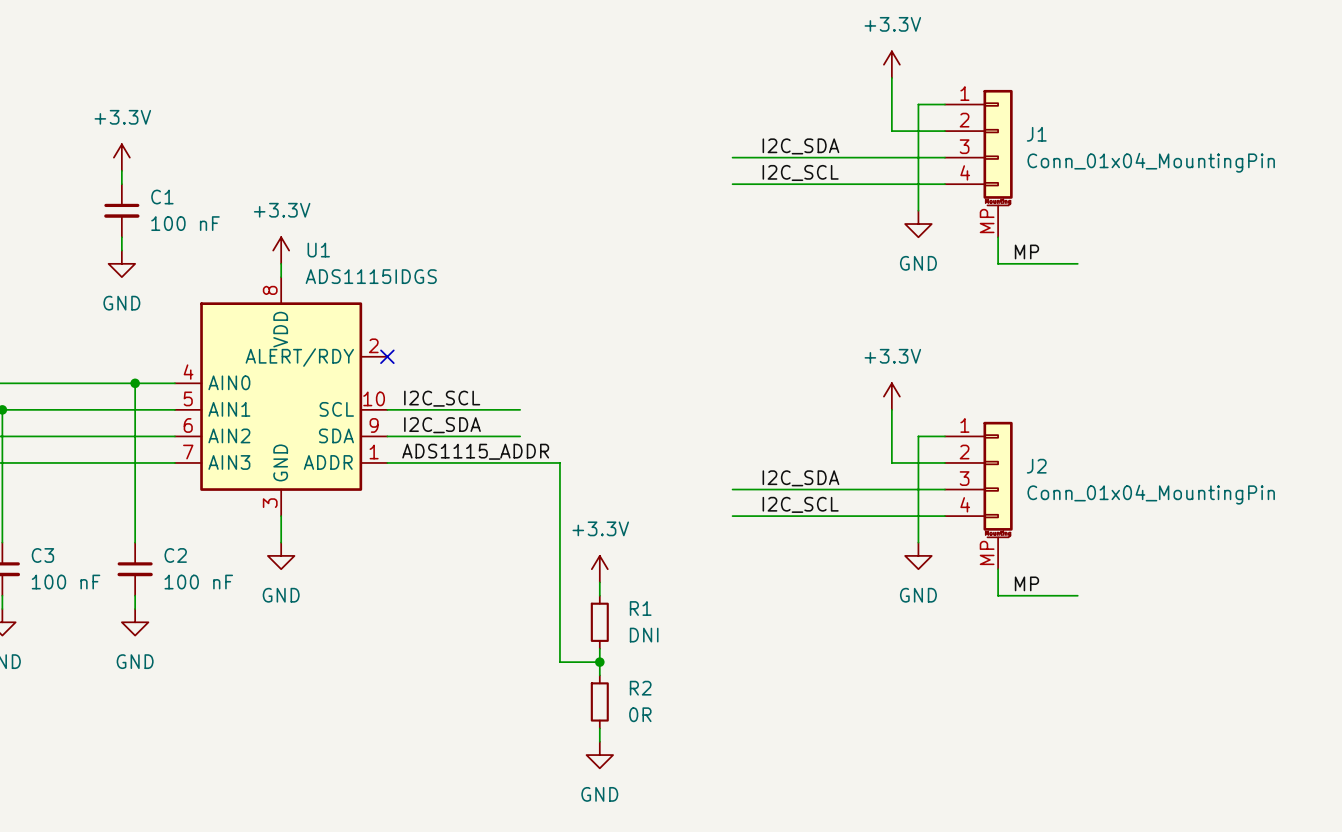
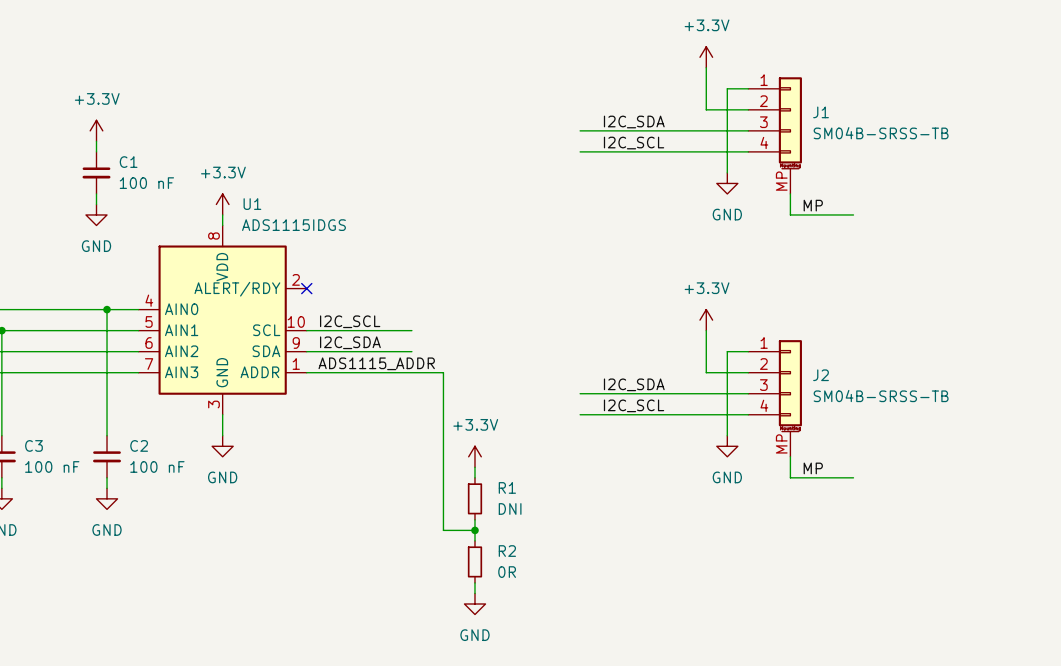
J1 value: Conn_01x04_MountingPin (1151, 162) -> SM04B-SRSS-TB (881, 133)
J2 value: Conn_01x04_MountingPin (1151, 494) -> SM04B-SRSS-TB (881, 396)

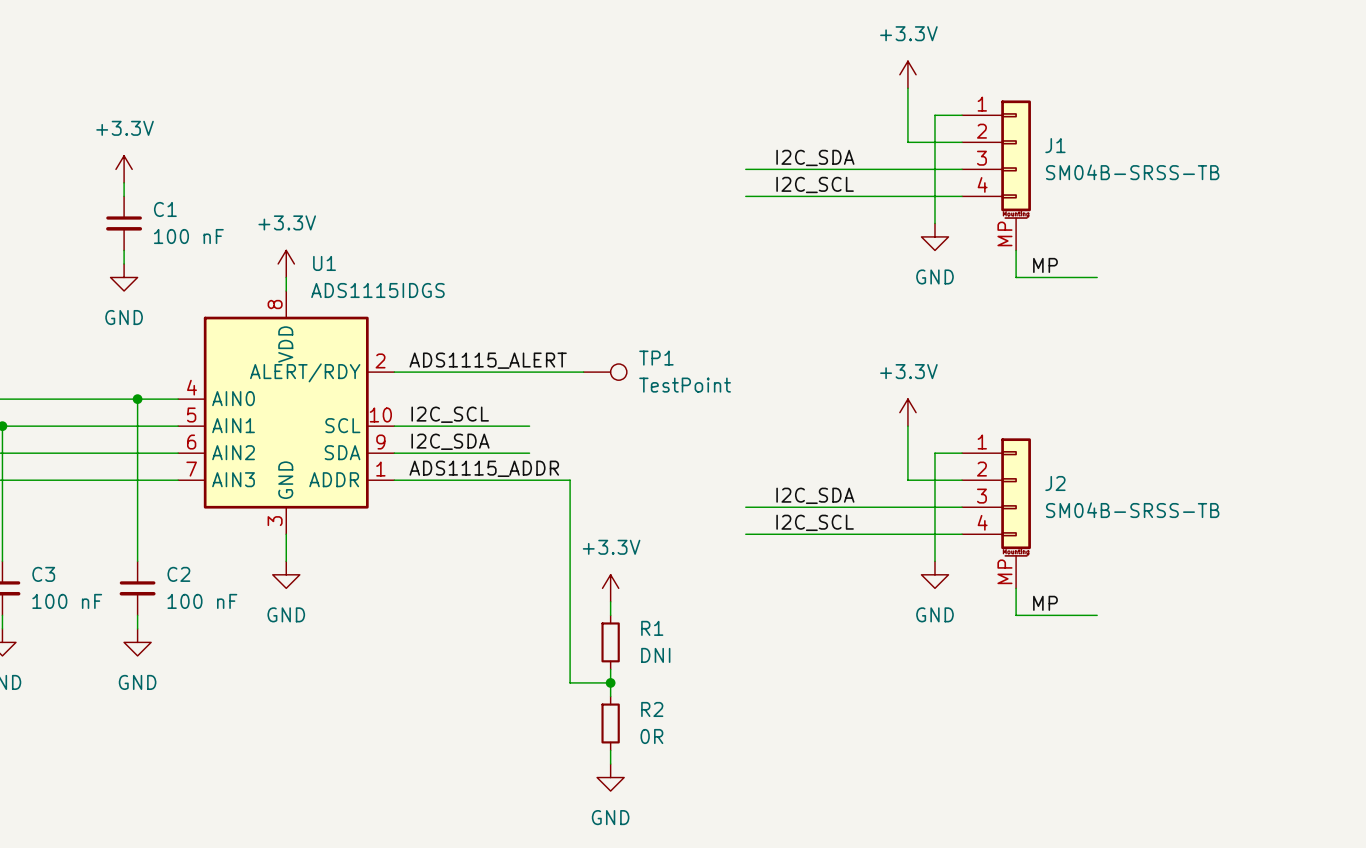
label: none -> ADS1115_ALERT (488, 360)
wire: none -> (394, 372) (583, 372)
no-connect mark: (306, 288) -> none
TP1: none -> TestPoint (605, 372)

